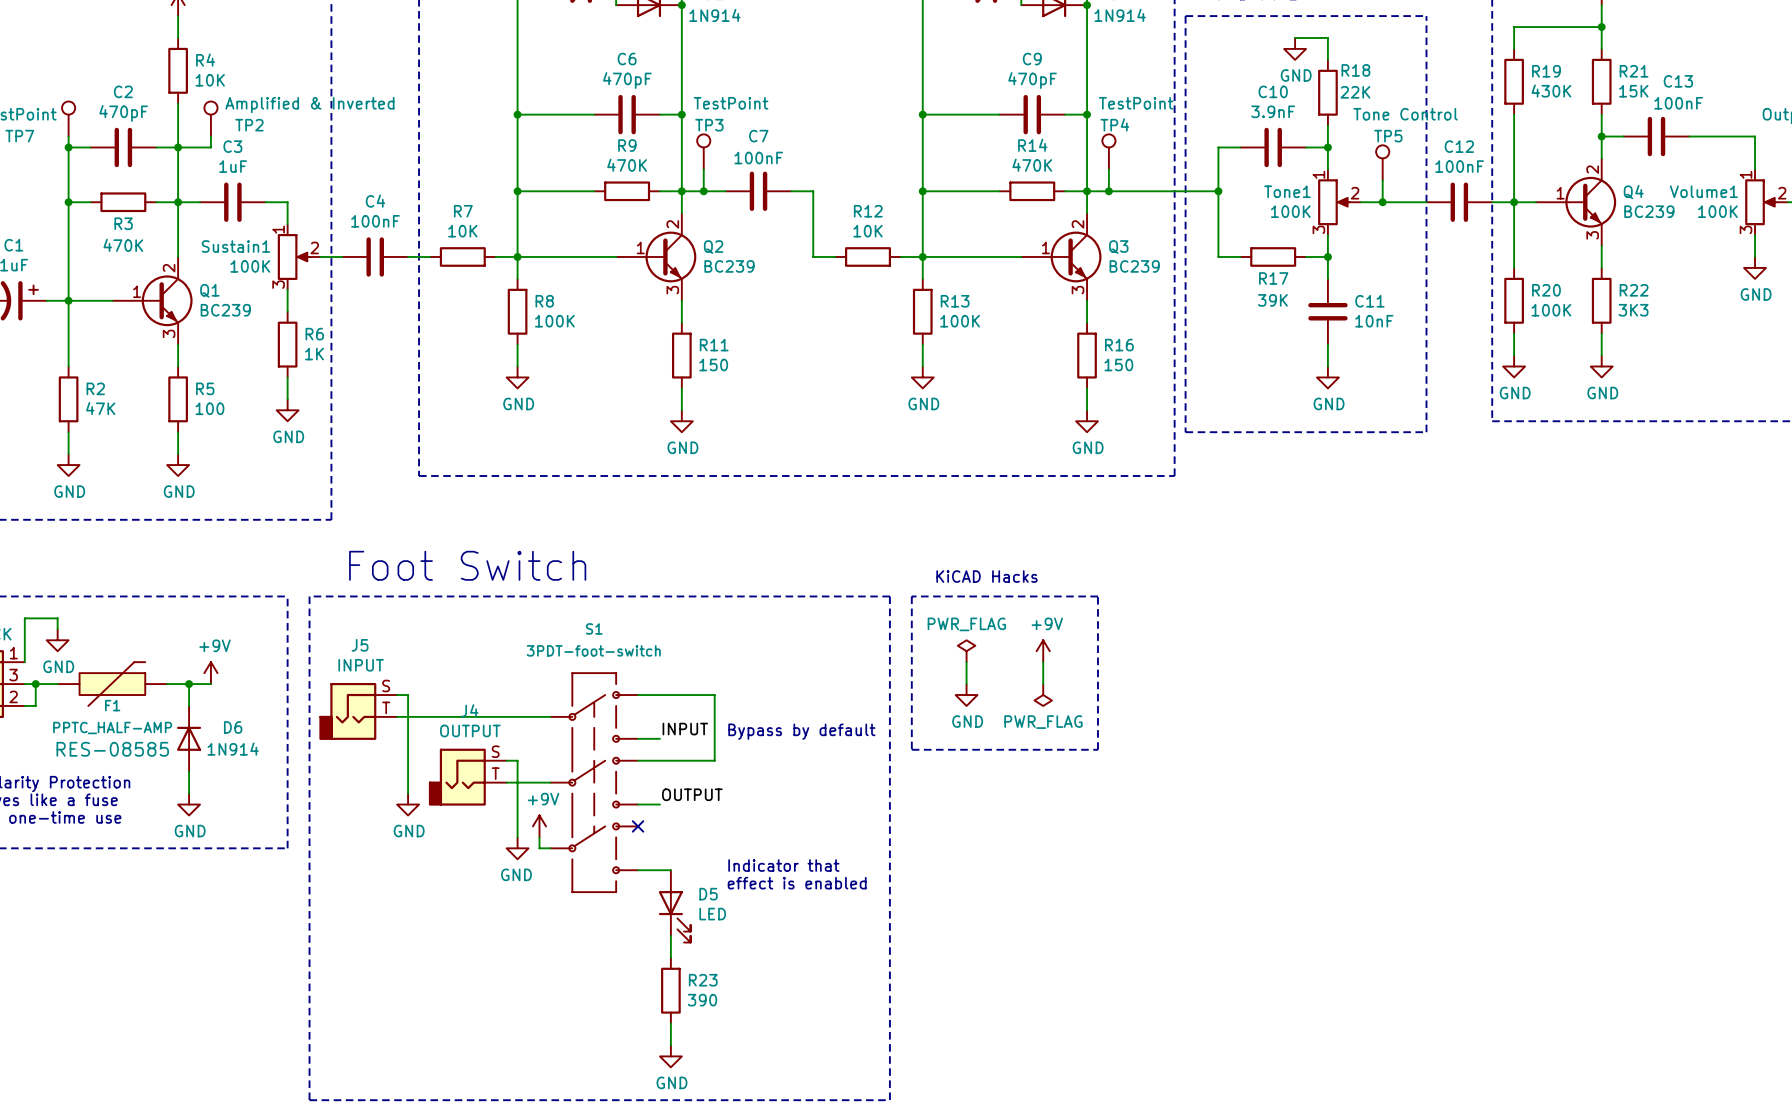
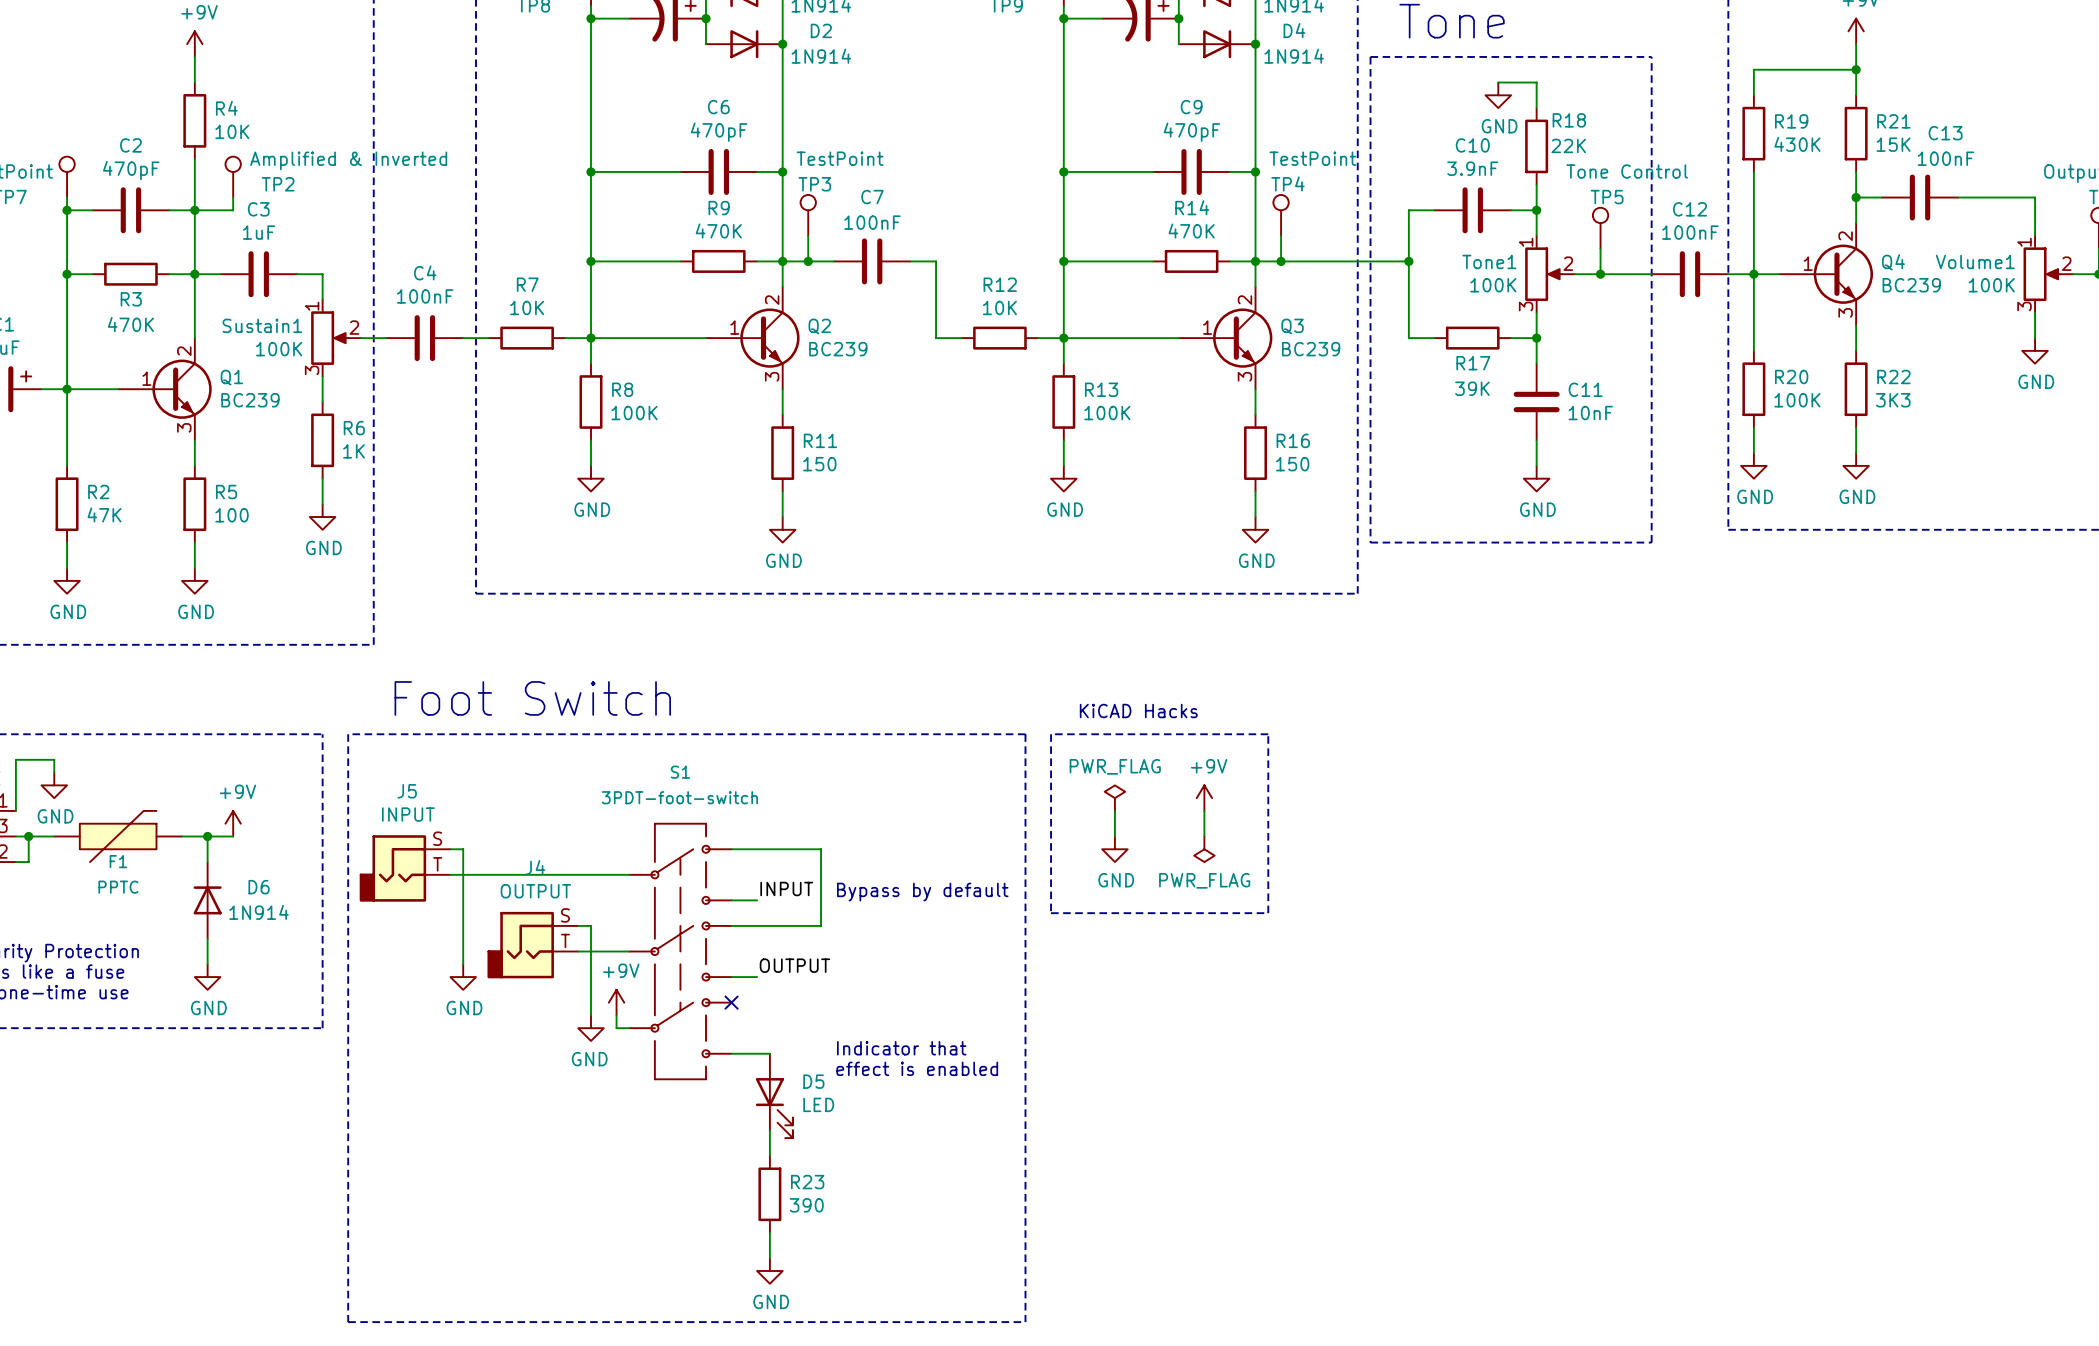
F1 value: PPTC_HALF-AMP (112, 727) -> PPTC (118, 887)
F1 text: RES-08585 (112, 749) -> none

